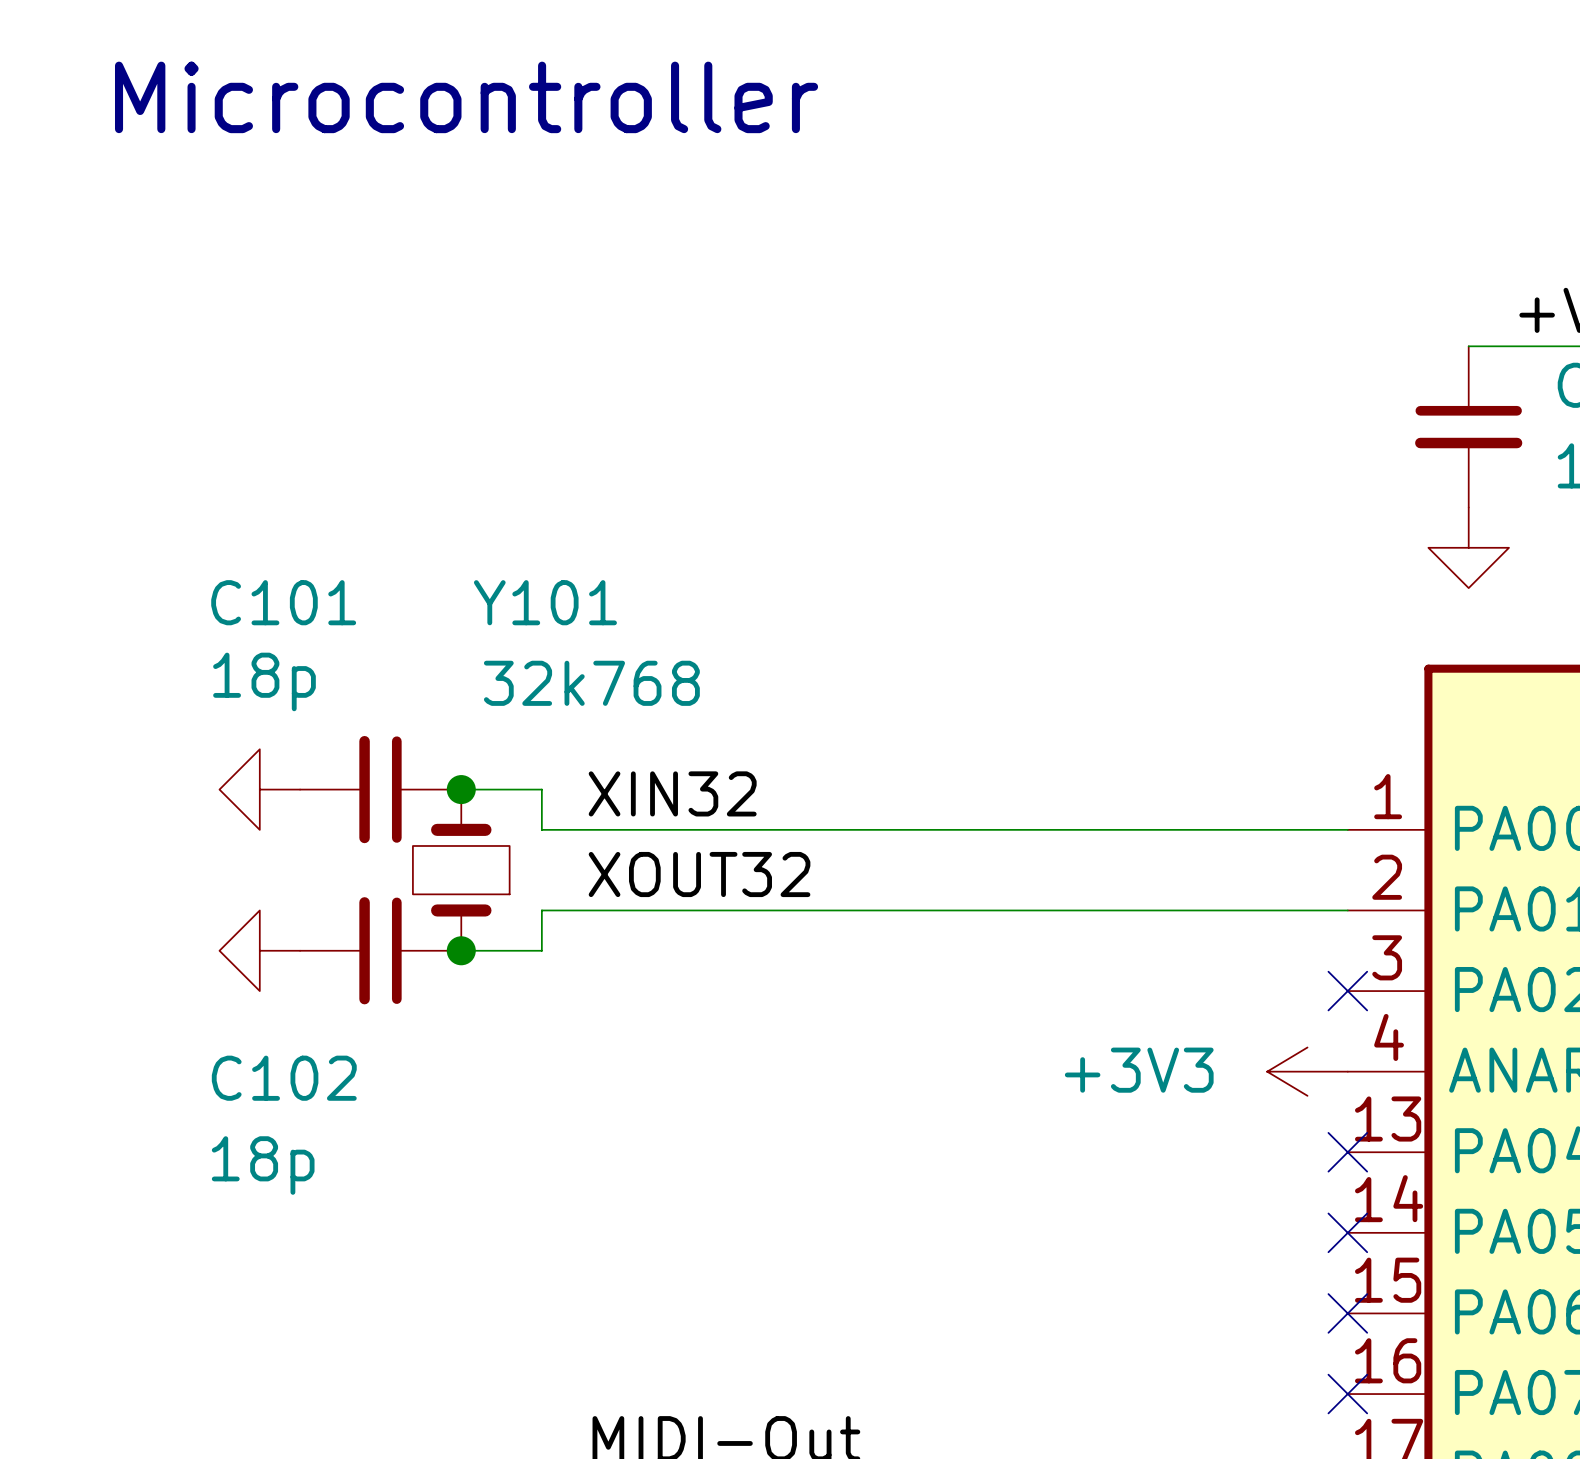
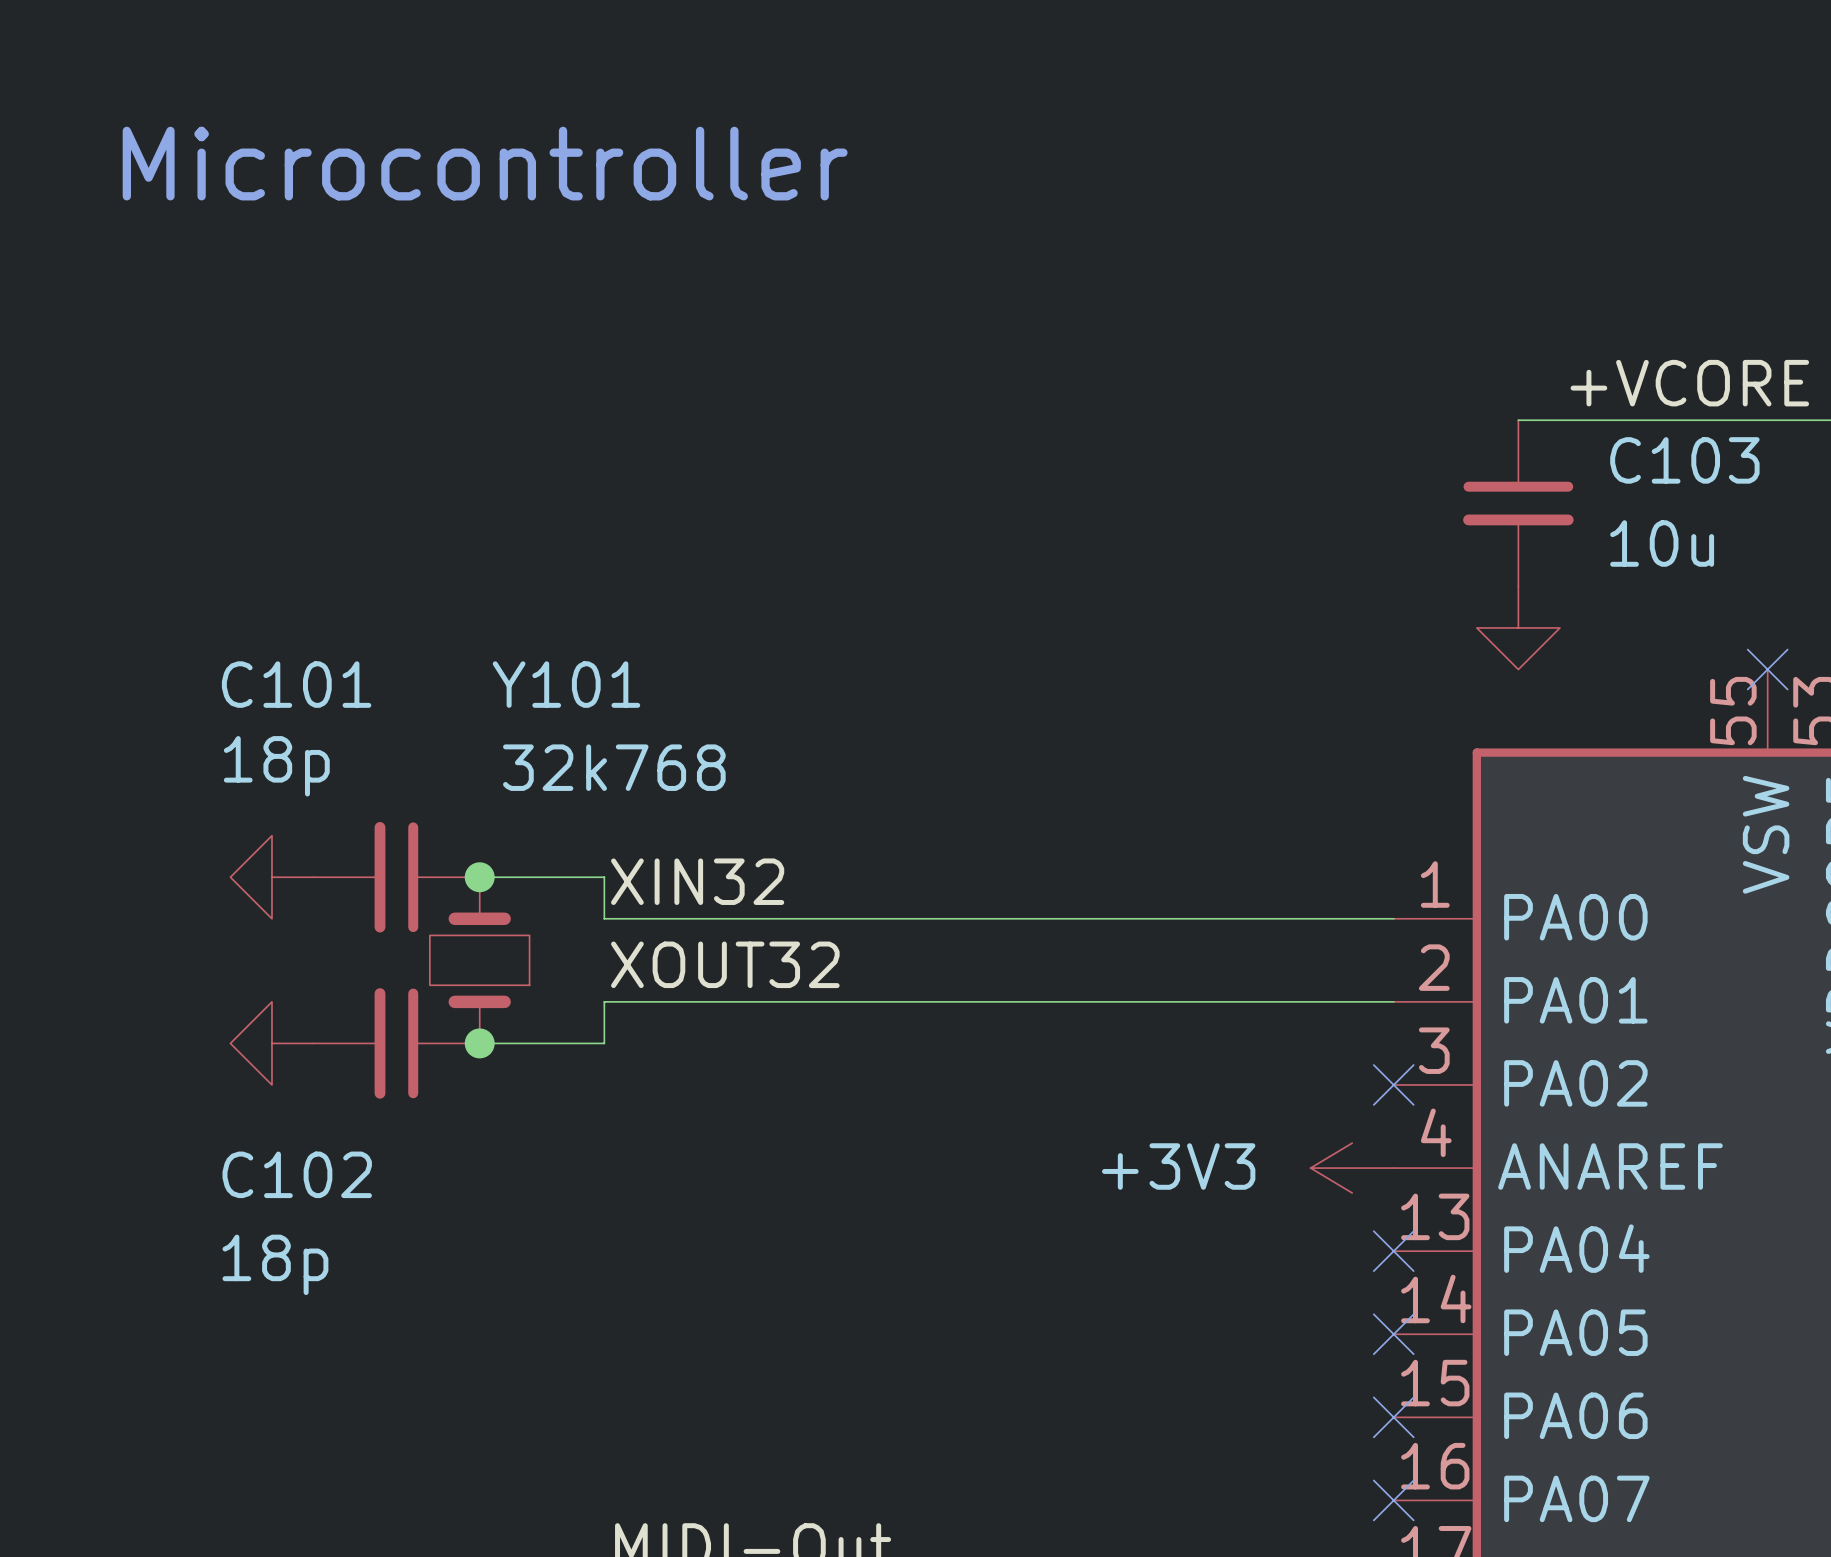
wire: (541, 789) (541, 829) (582, 829) -> (562, 877) (604, 877) (604, 918)
wire: (582, 910) (541, 910) (541, 950) -> (604, 1001) (604, 1043) (562, 1043)

